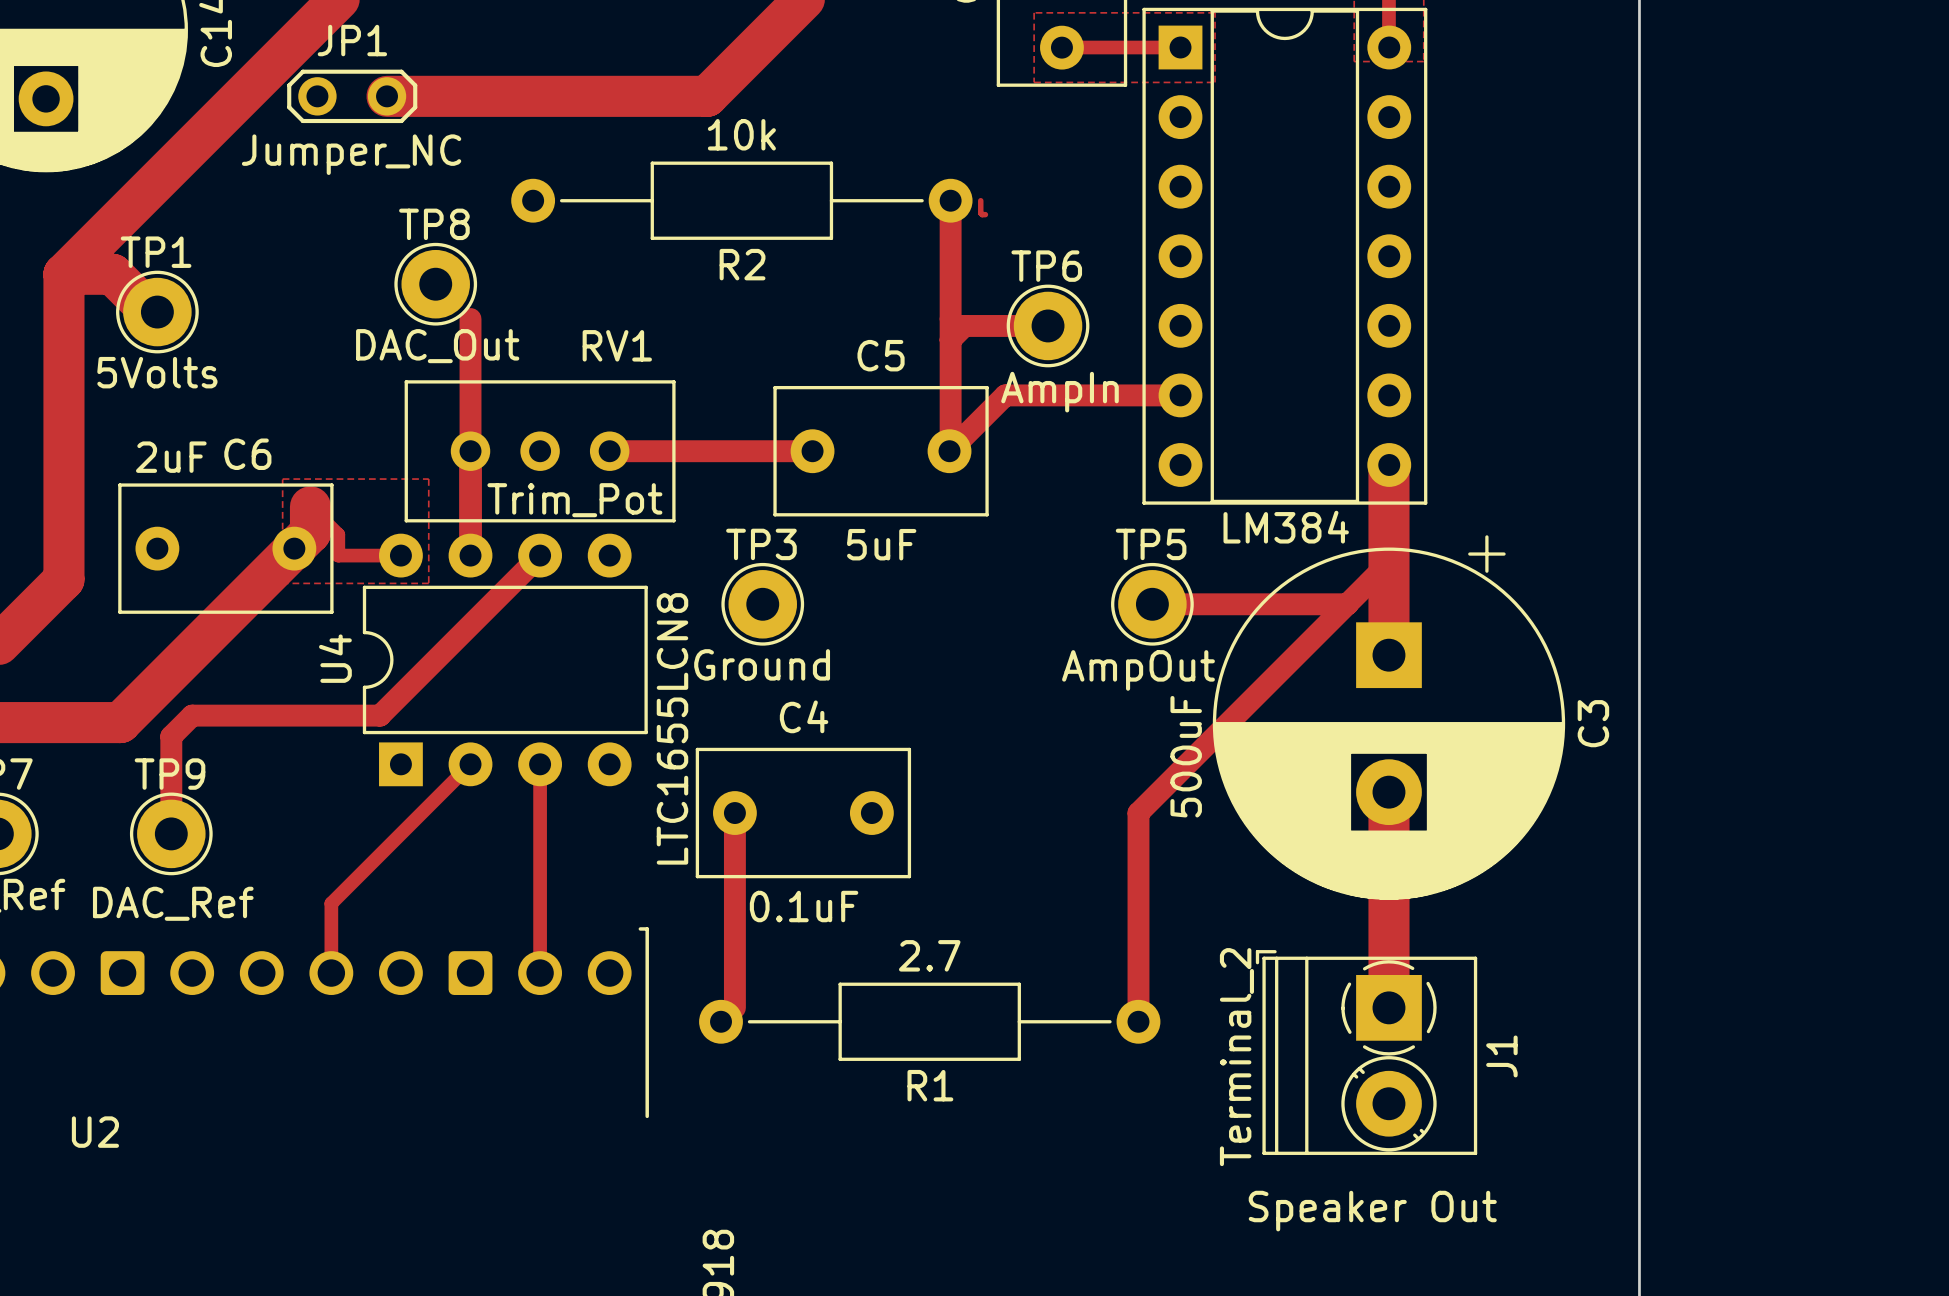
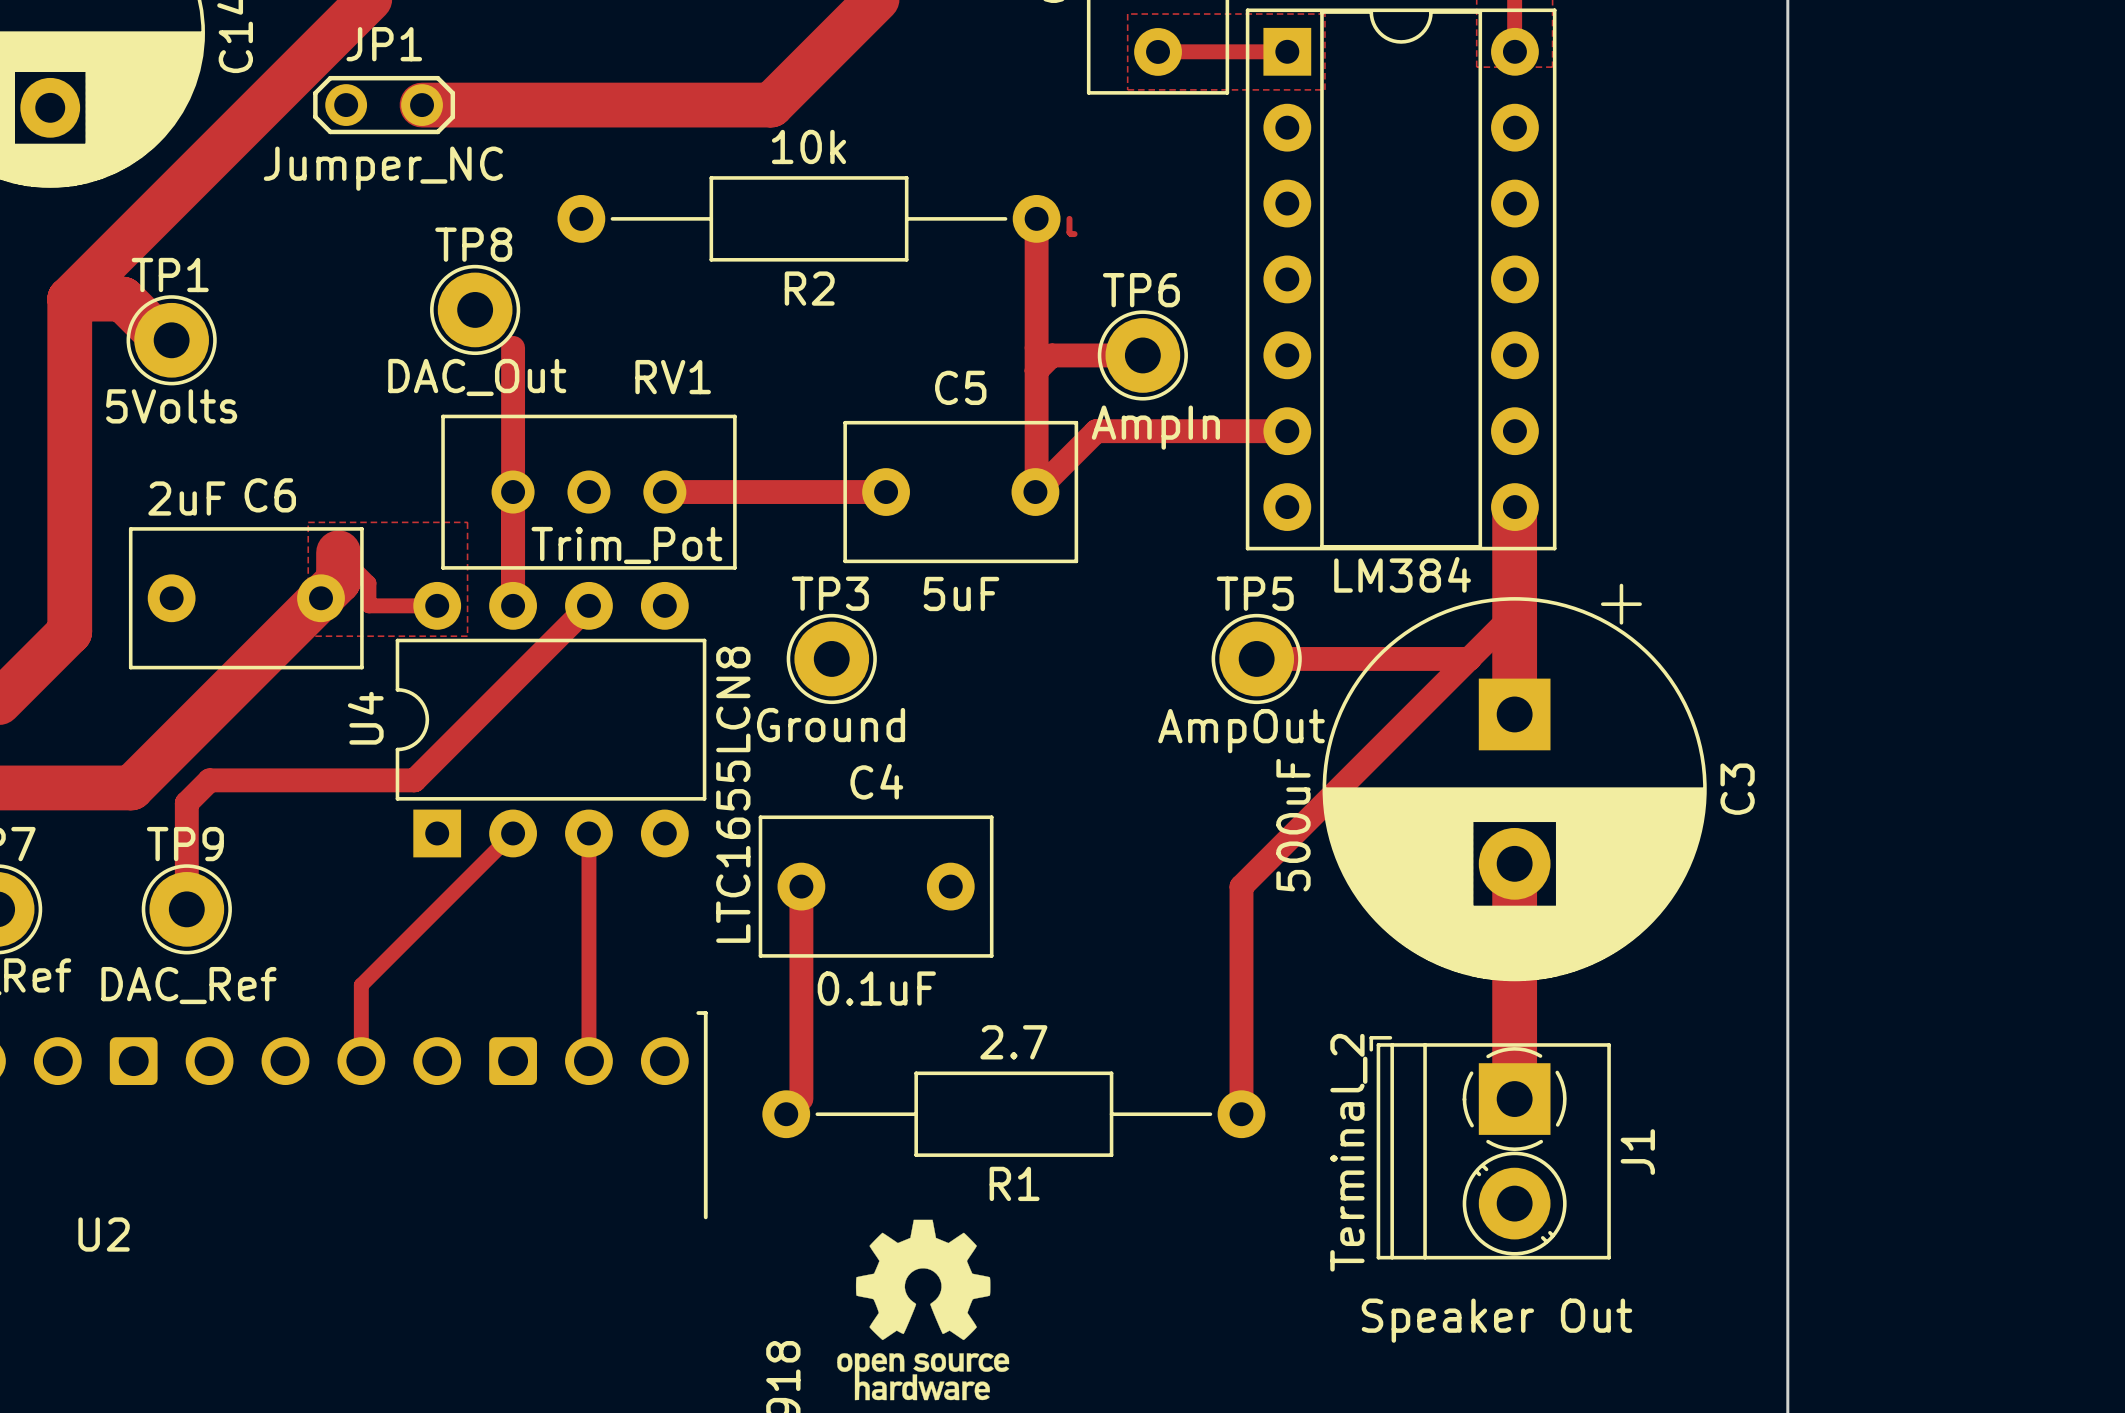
drawing: none -> [837, 1219, 1010, 1401]

